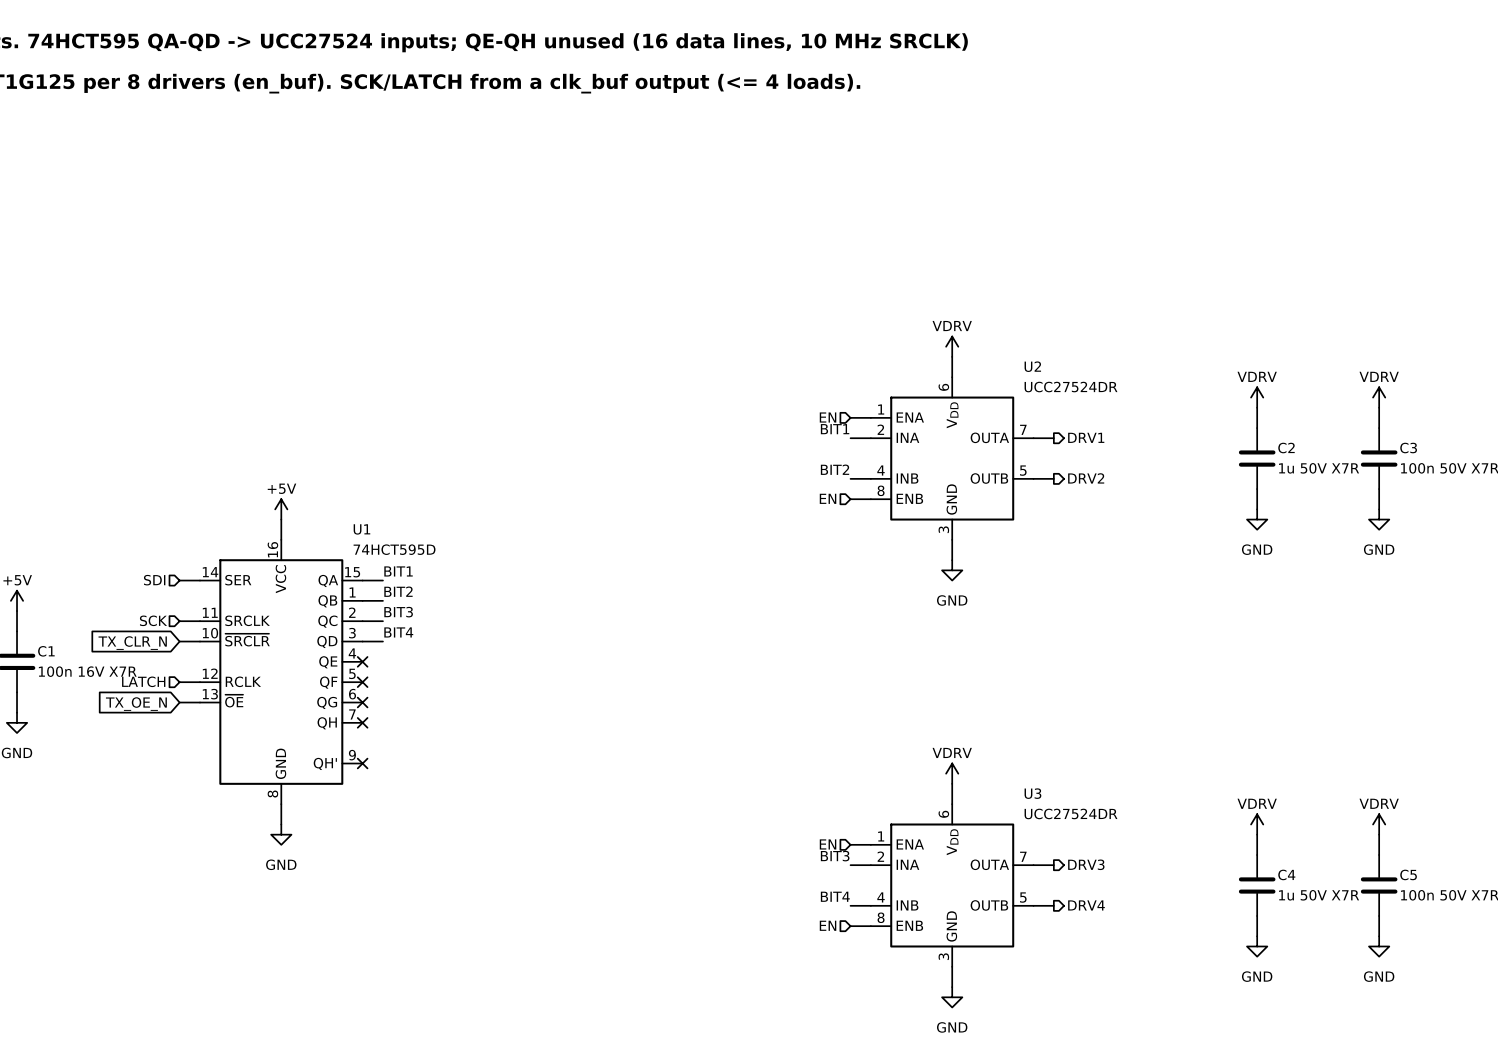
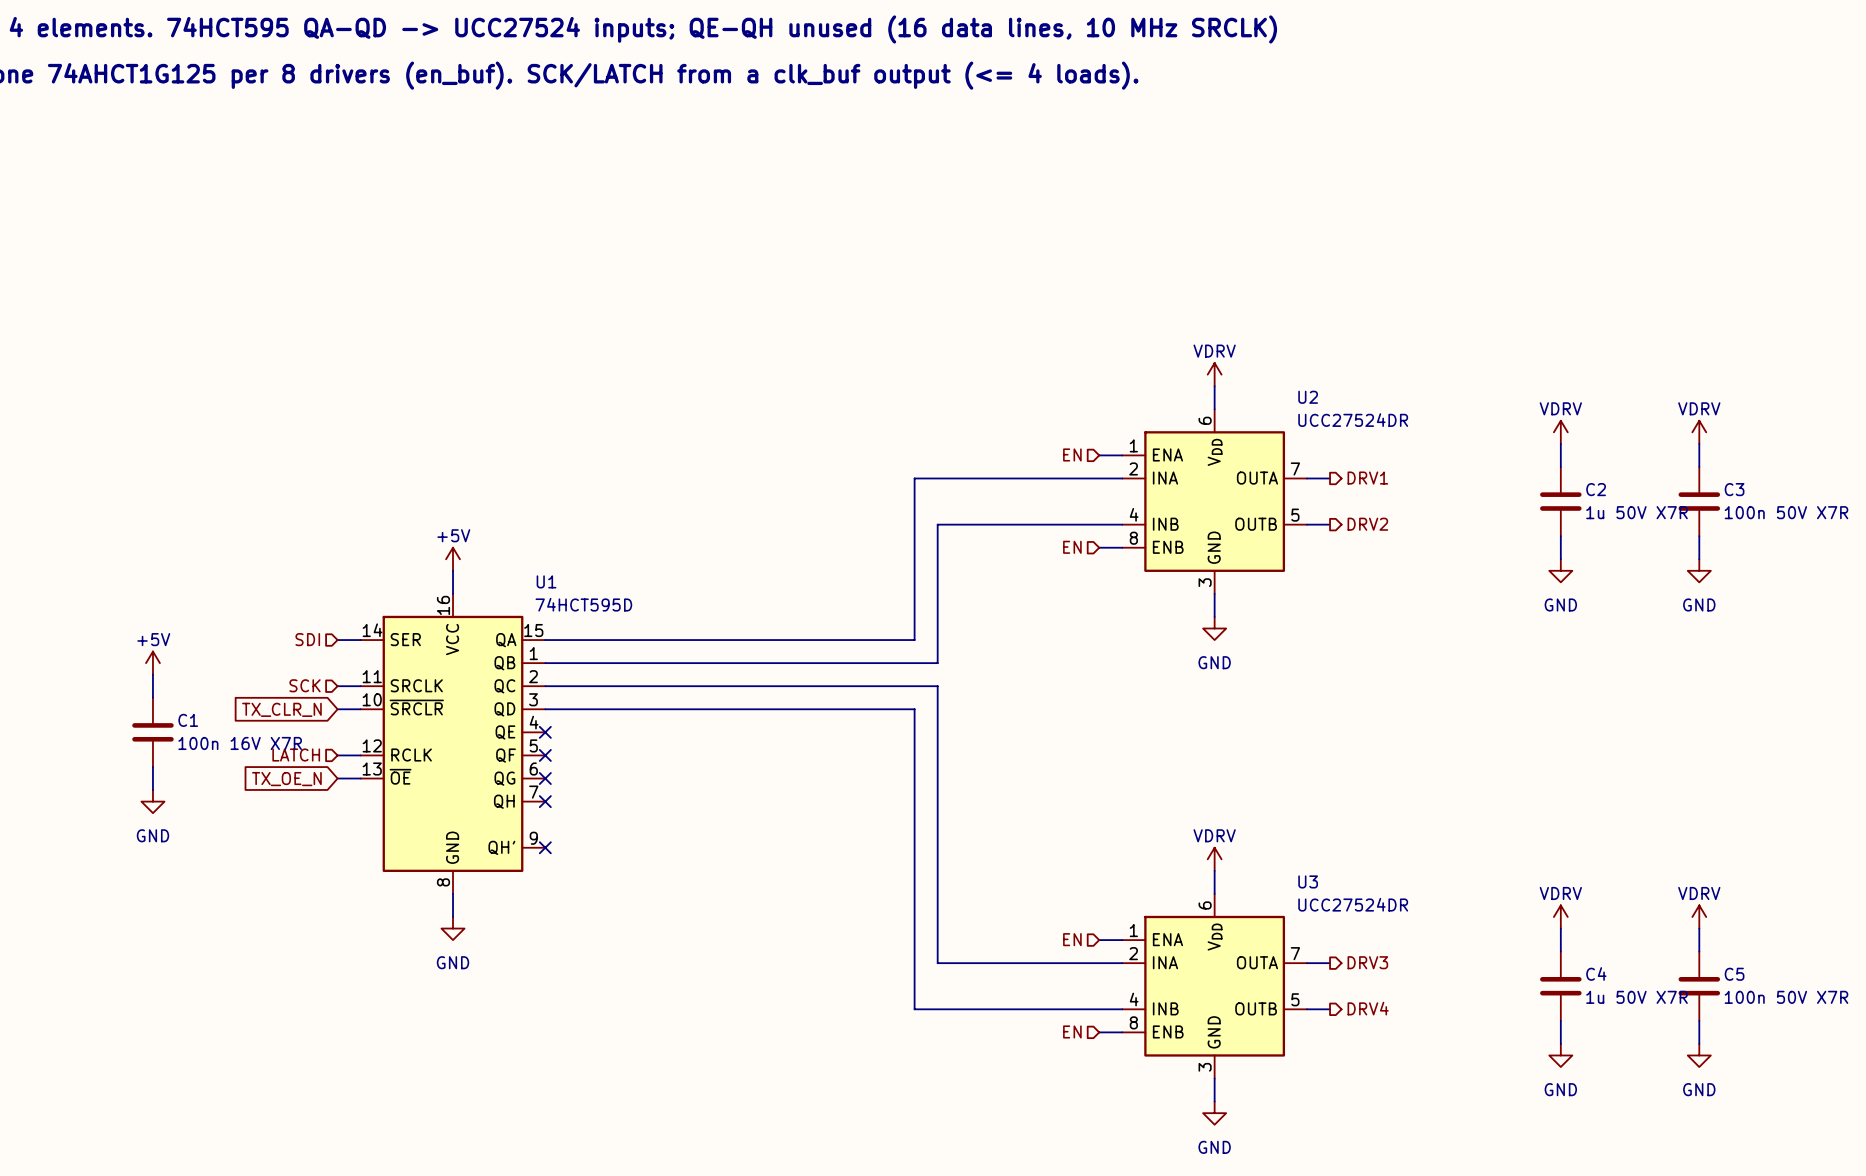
label: BIT1 (835, 429) -> none
wire: none -> (1099, 478) (914, 478) (914, 640) (568, 640)
label: BIT2 (835, 469) -> none
wire: none -> (1099, 524) (937, 524) (937, 663) (568, 663)
label: BIT1 (398, 571) -> none
label: BIT2 (398, 591) -> none
label: BIT3 (398, 612) -> none
wire: none -> (568, 686) (937, 686) (937, 963) (1099, 963)
label: BIT4 (398, 632) -> none
wire: none -> (568, 709) (914, 709) (914, 1009) (1099, 1009)
label: BIT3 (835, 856) -> none
label: BIT4 (835, 896) -> none

